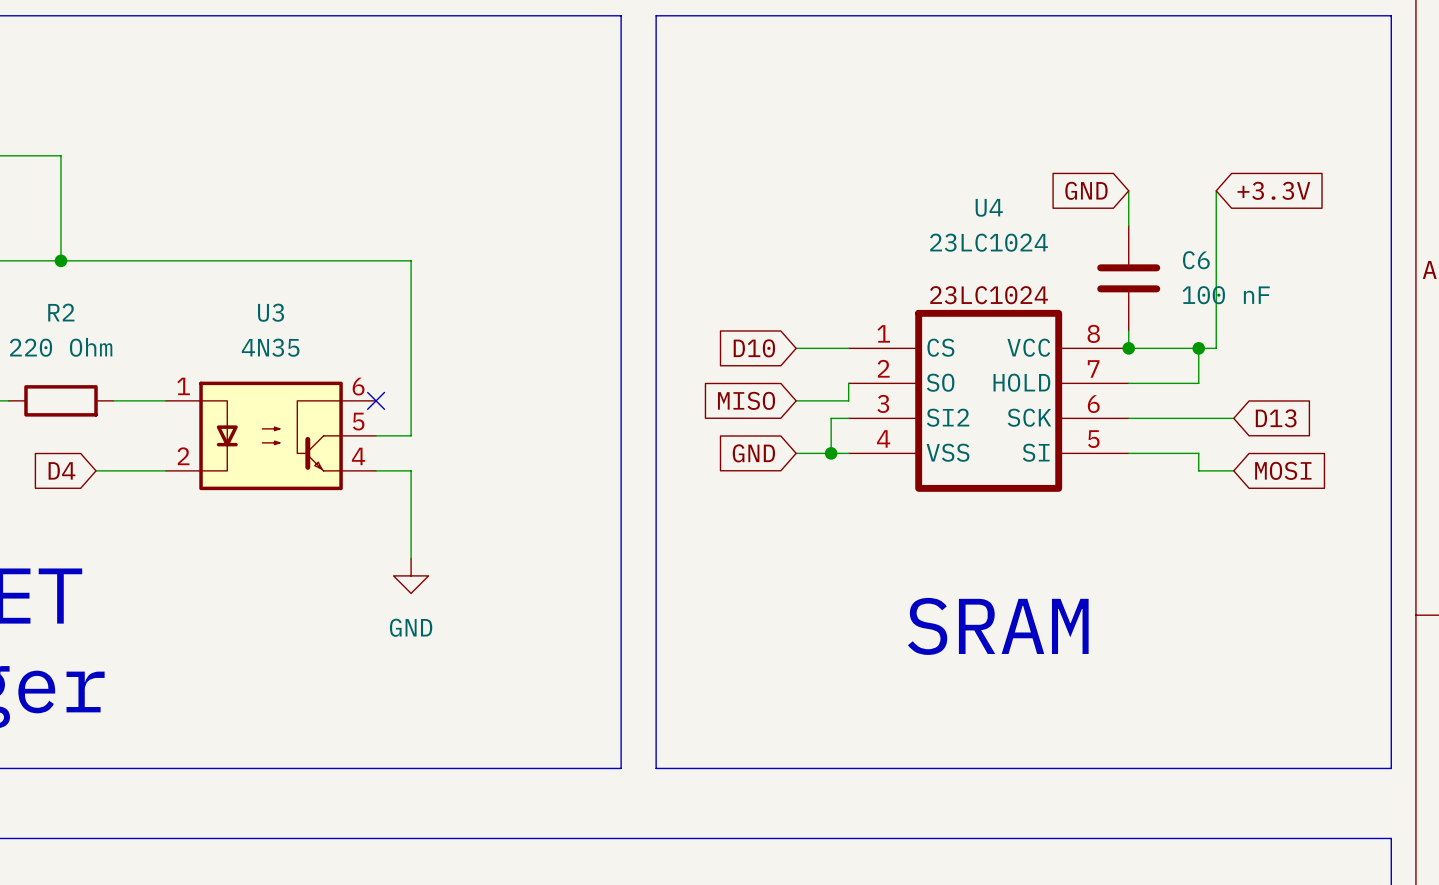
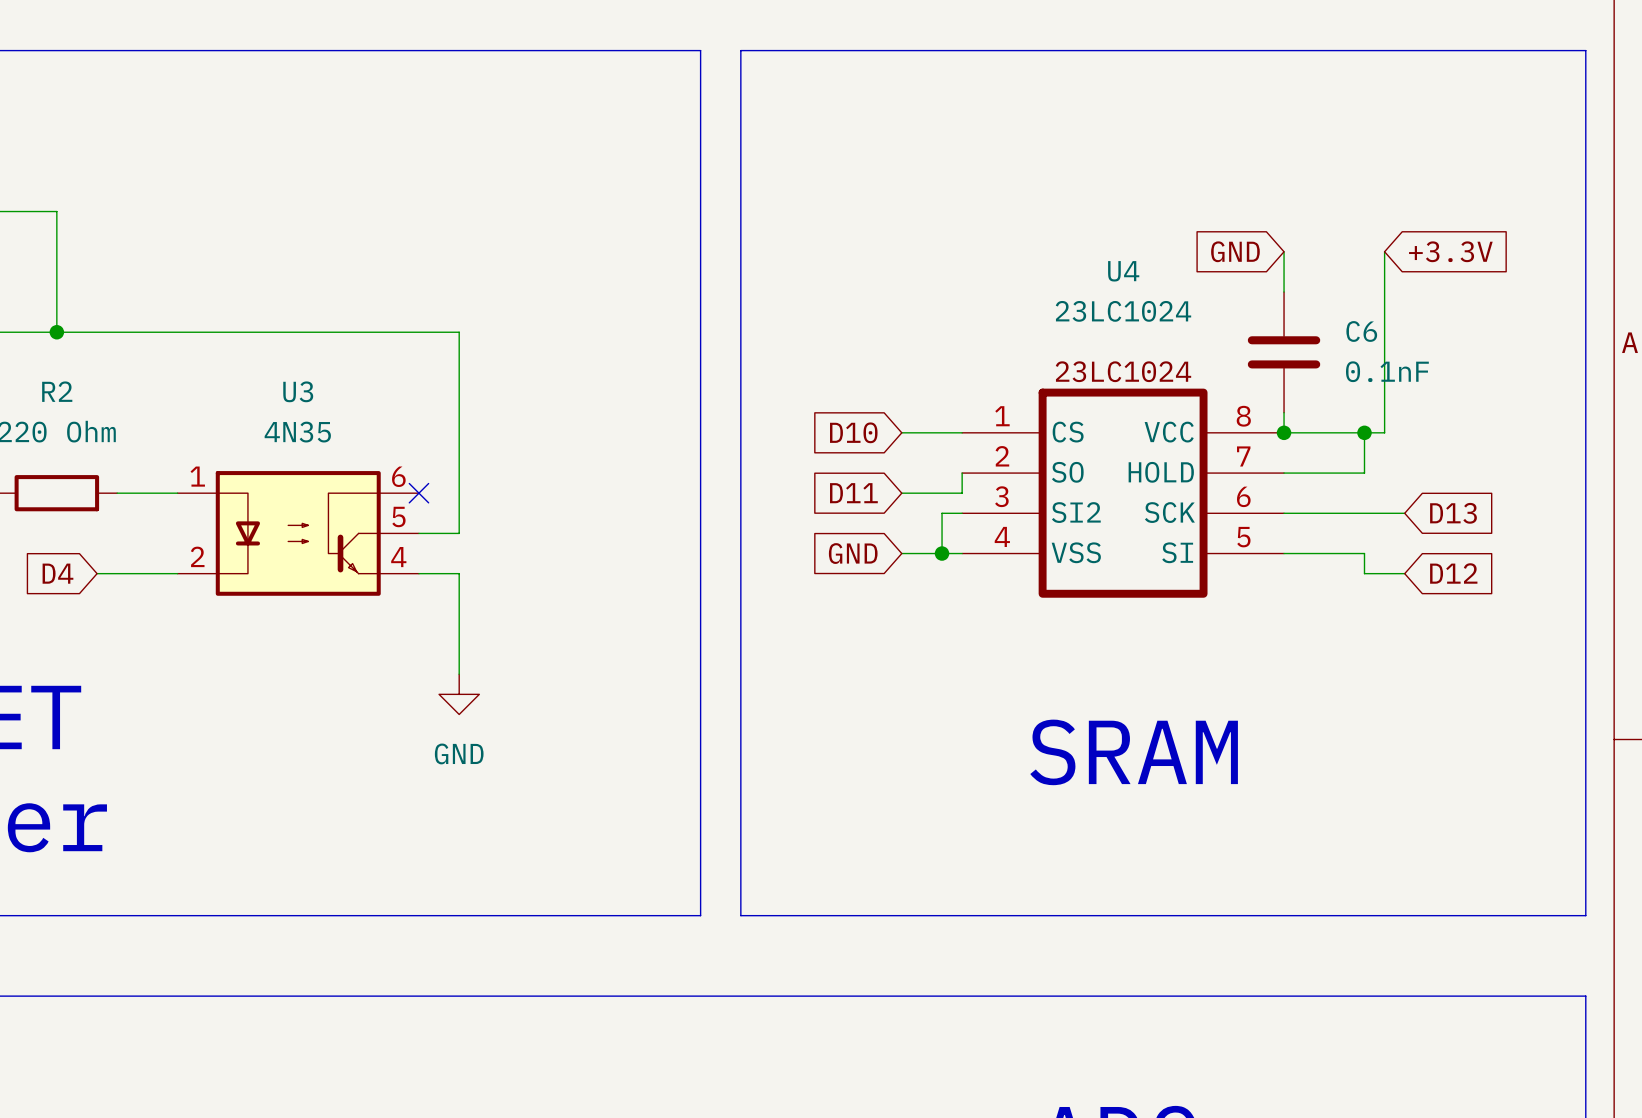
C6 value: 100 nF (1226, 295) -> 0.1nF (1387, 371)
global label: MISO (746, 400) -> D11 (853, 493)
global label: MOSI (1283, 470) -> D12 (1453, 573)

